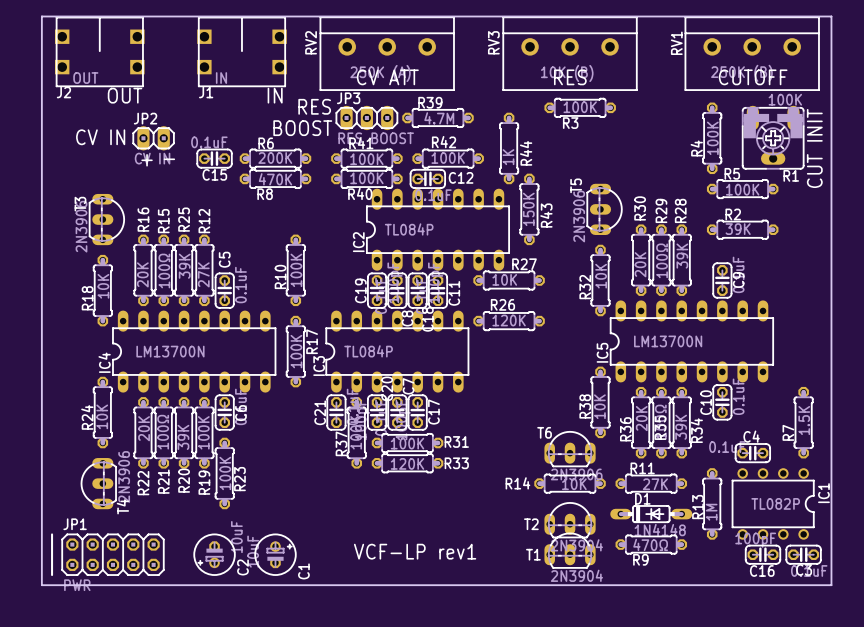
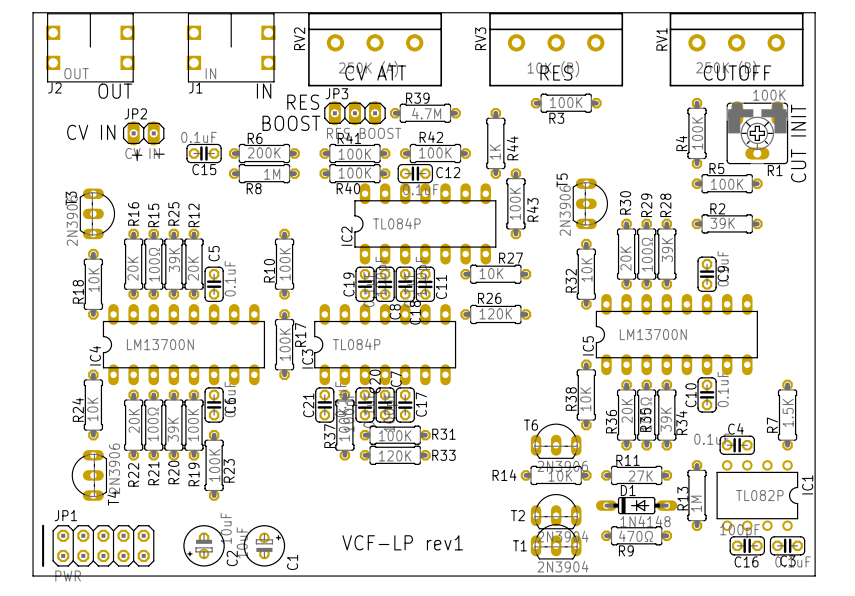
R8 value: 470K (275, 179) -> 1M (272, 174)
R43 value: 150K (528, 209) -> 100K (515, 203)
R25 value: 27K (203, 274) -> 20K (193, 268)

